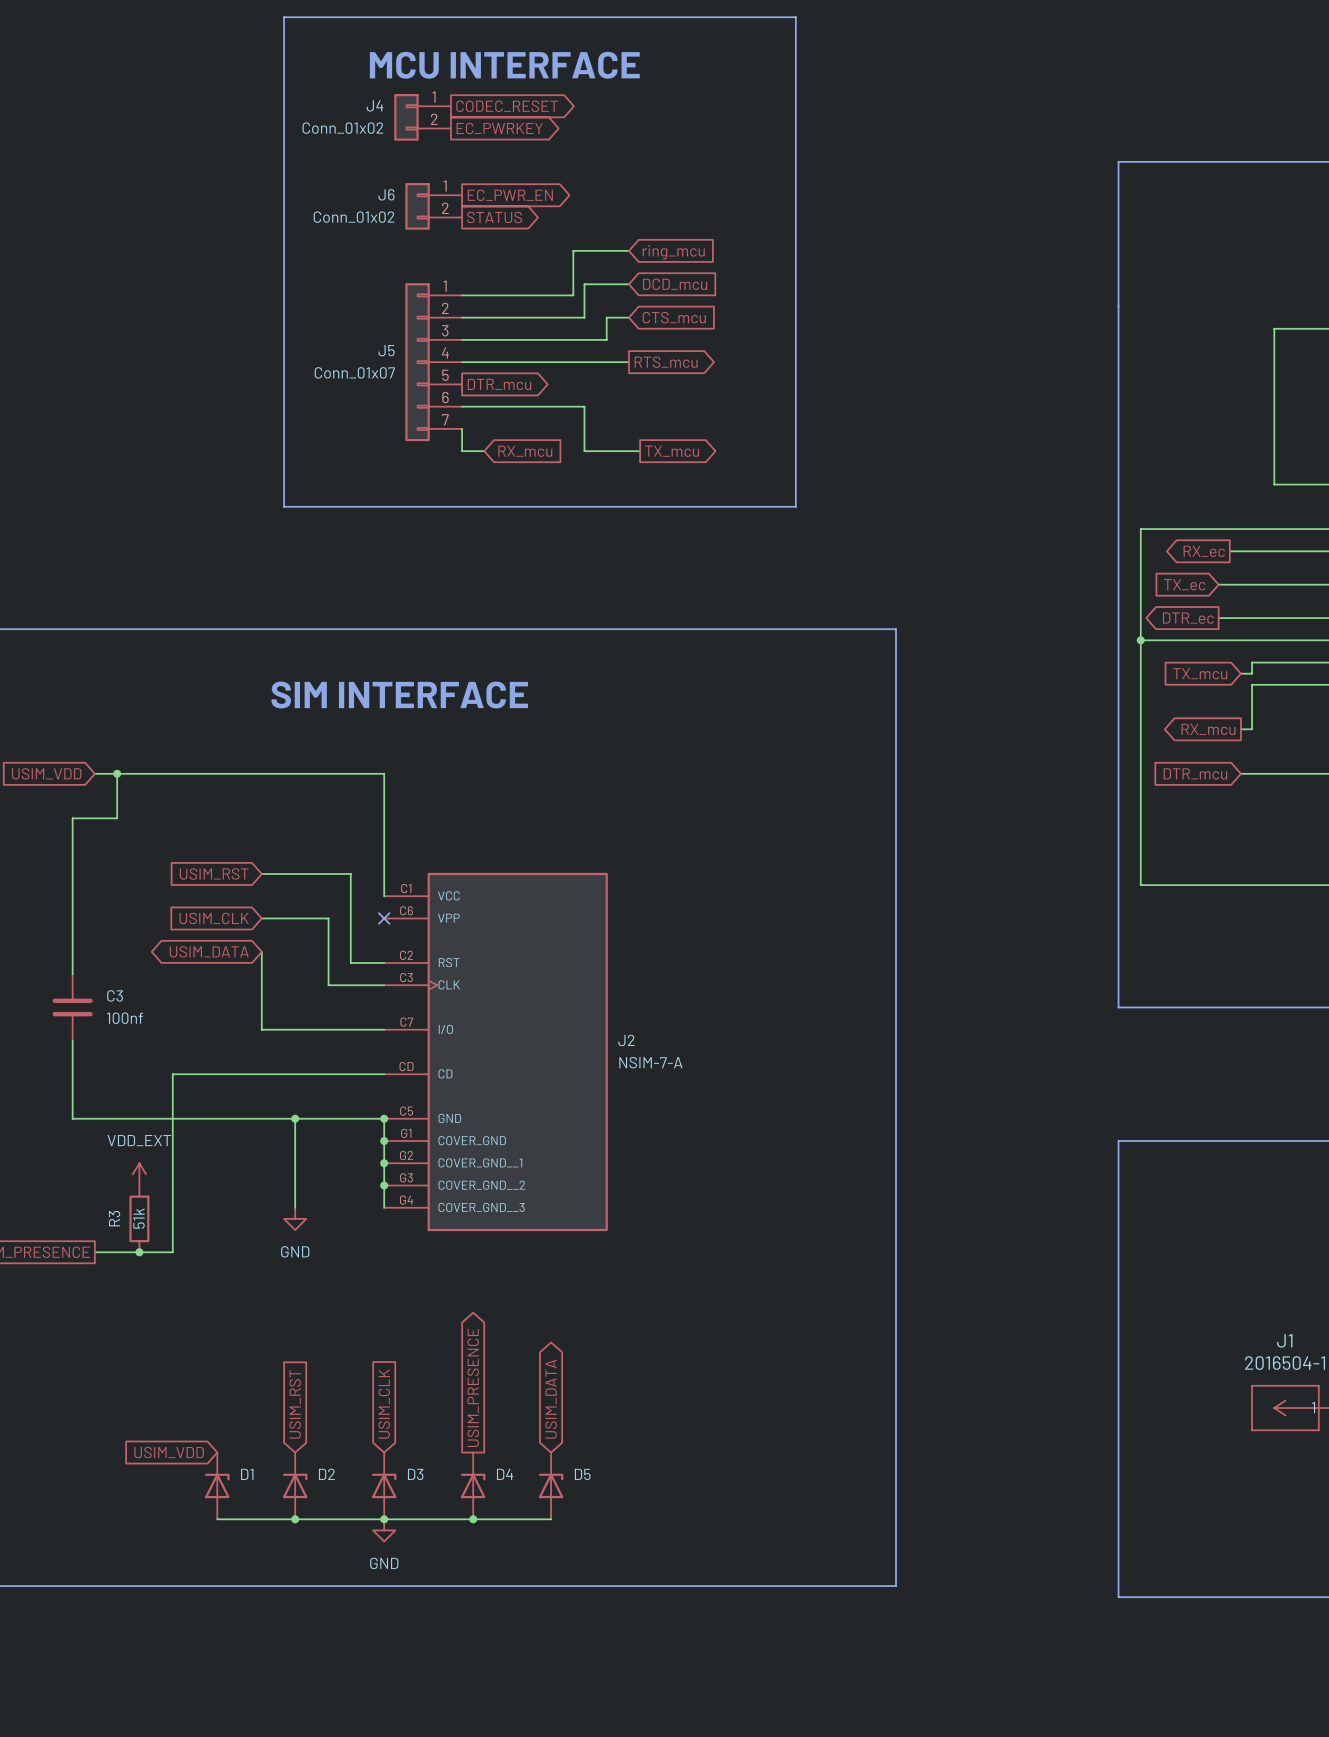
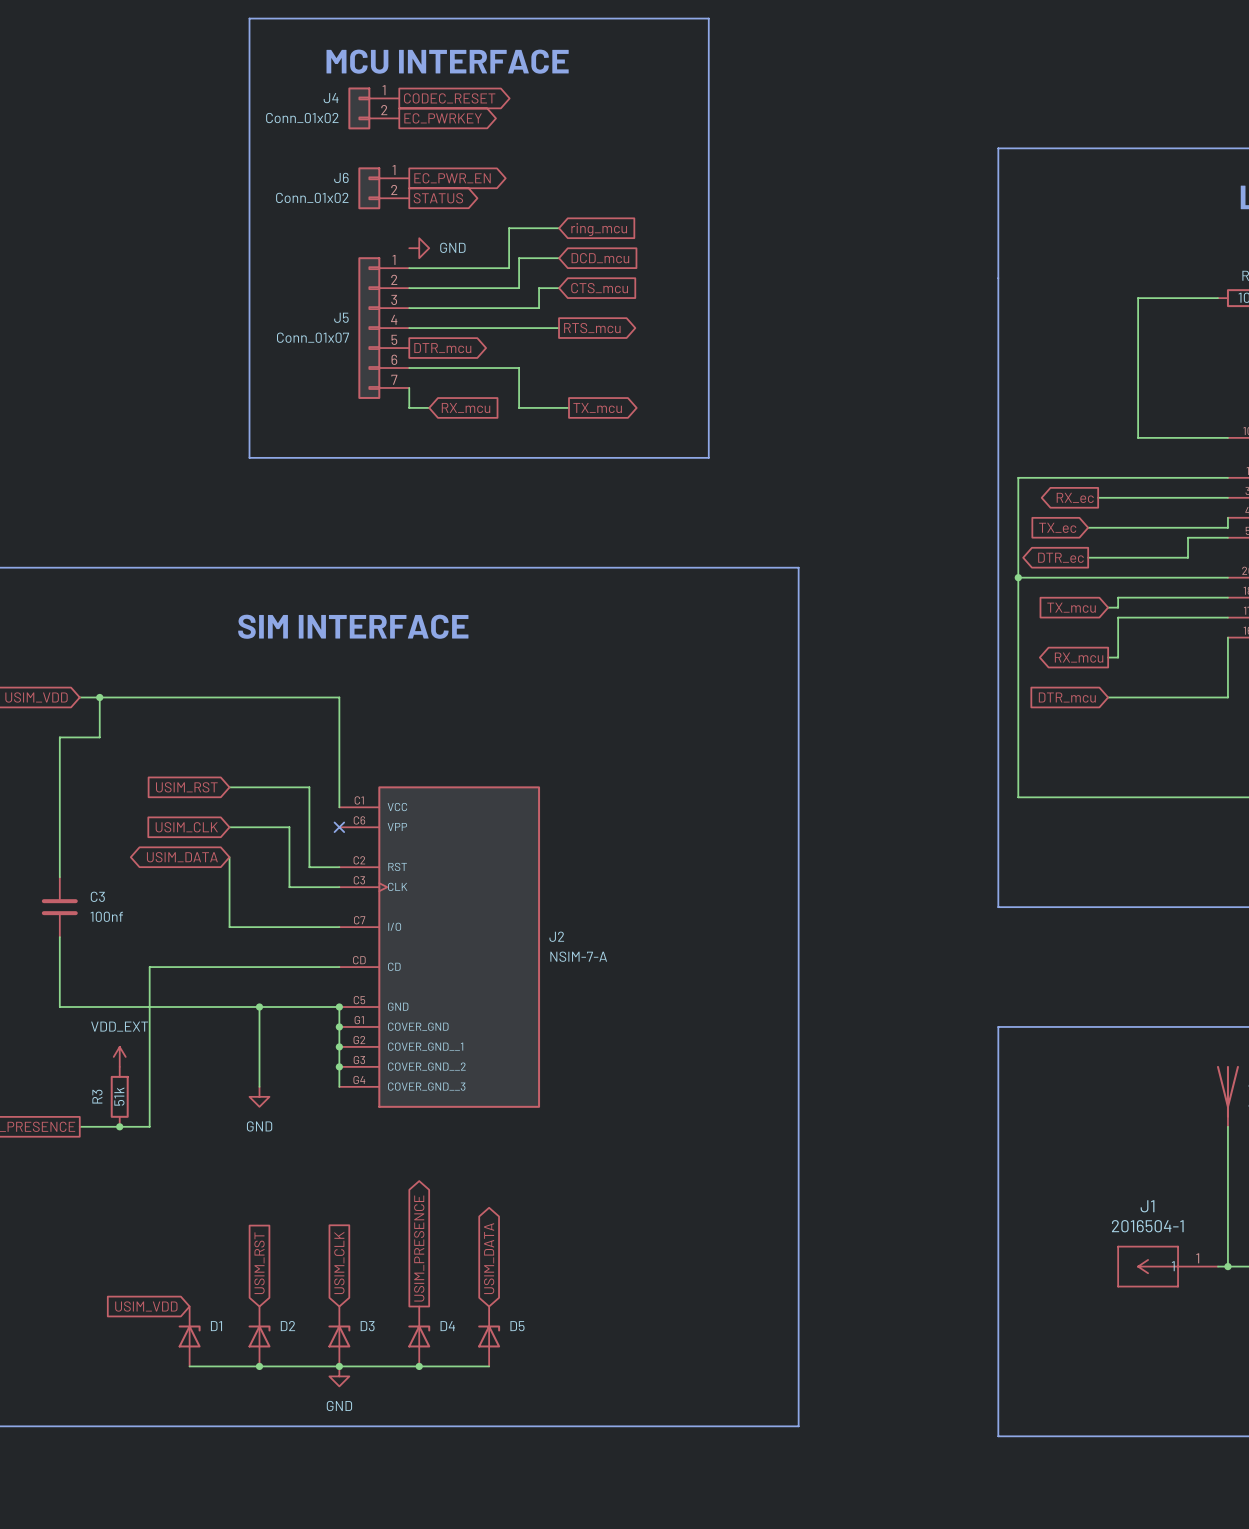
power symbol: none -> GND (419, 248)

